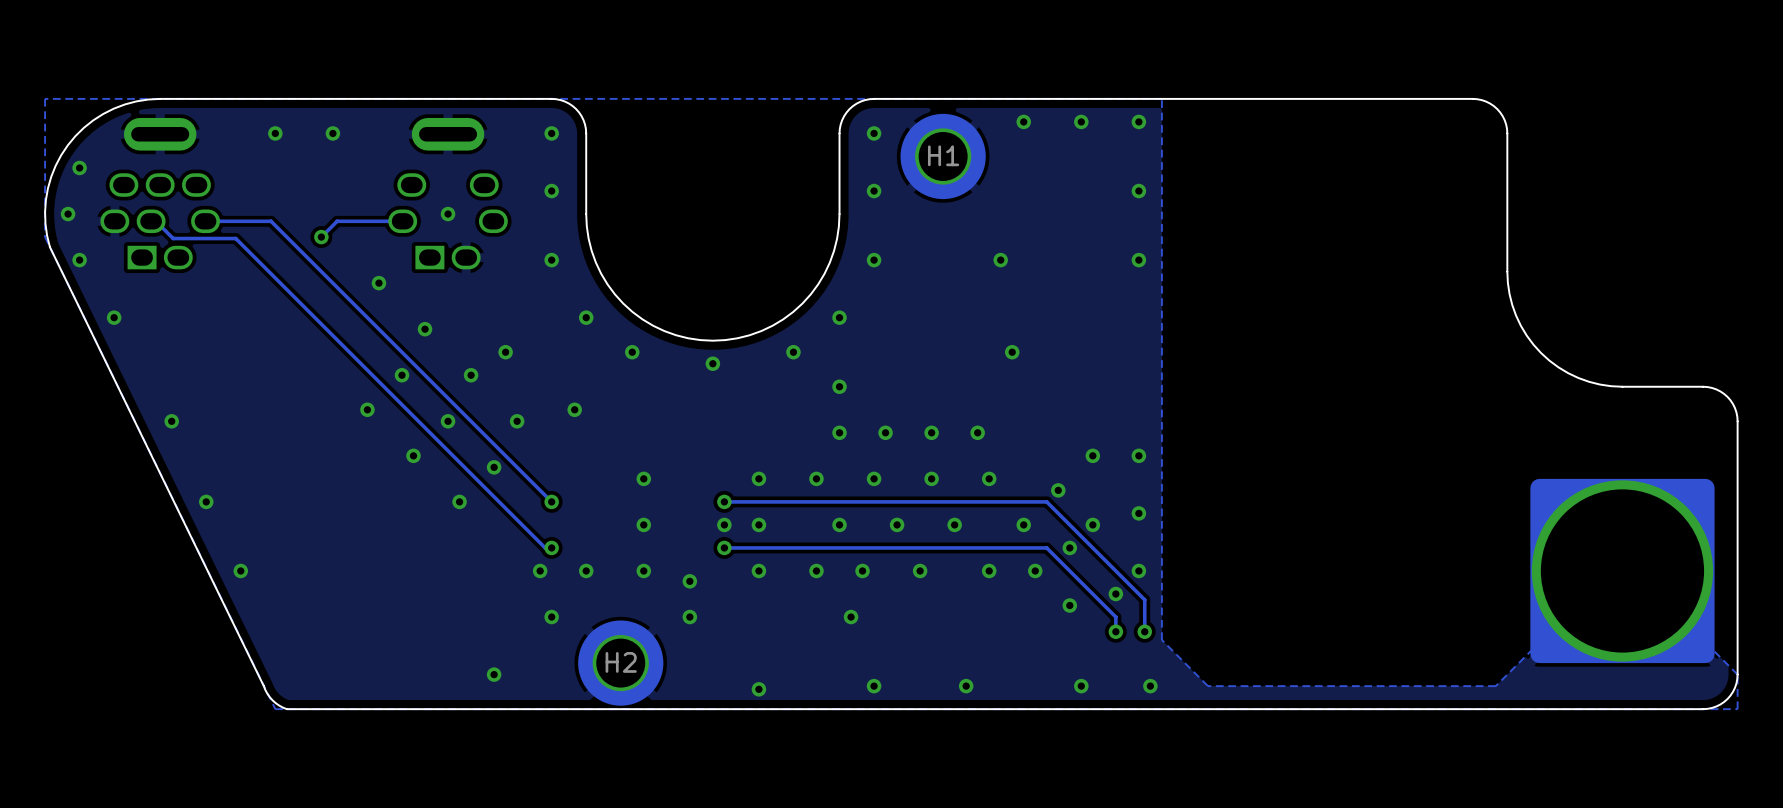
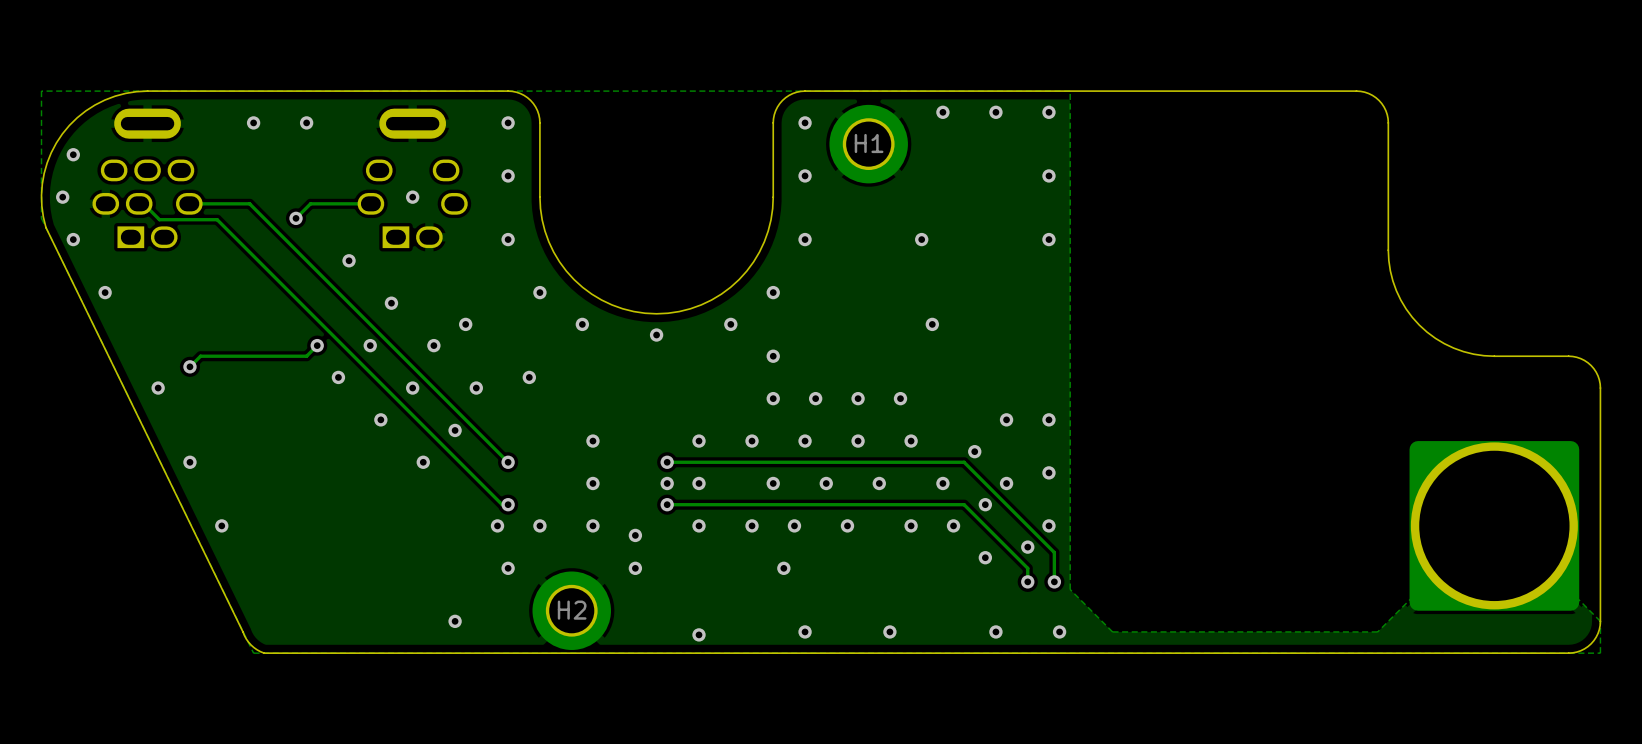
track: none -> (317, 345) (306, 356) (200, 356) (189, 366)
via: none -> (317, 345)
via: none -> (189, 366)

